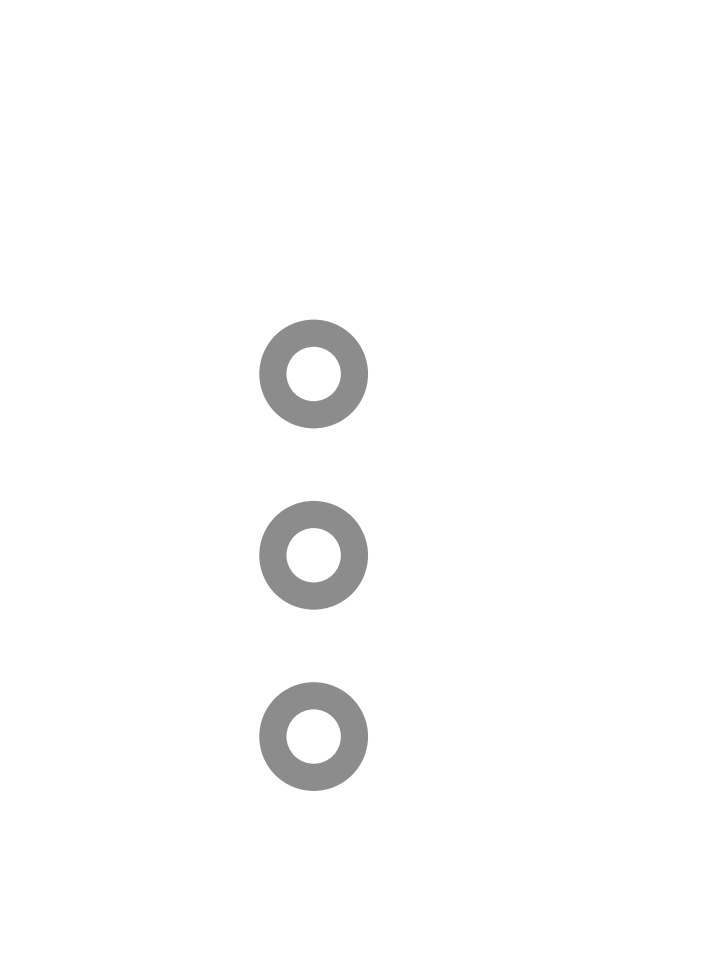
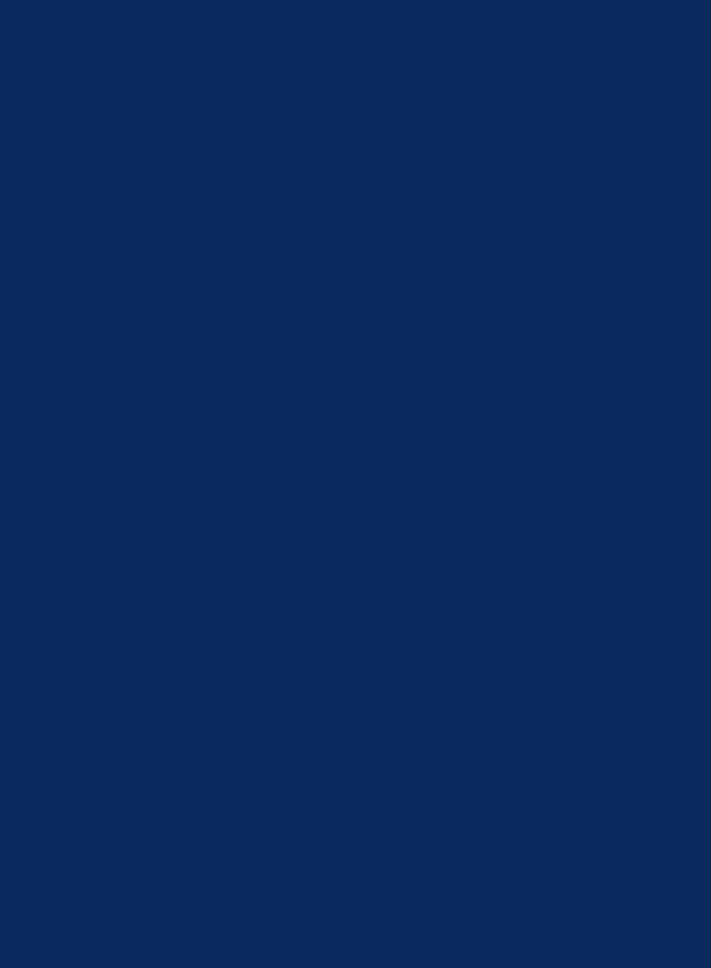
part: (313, 555) -> none

